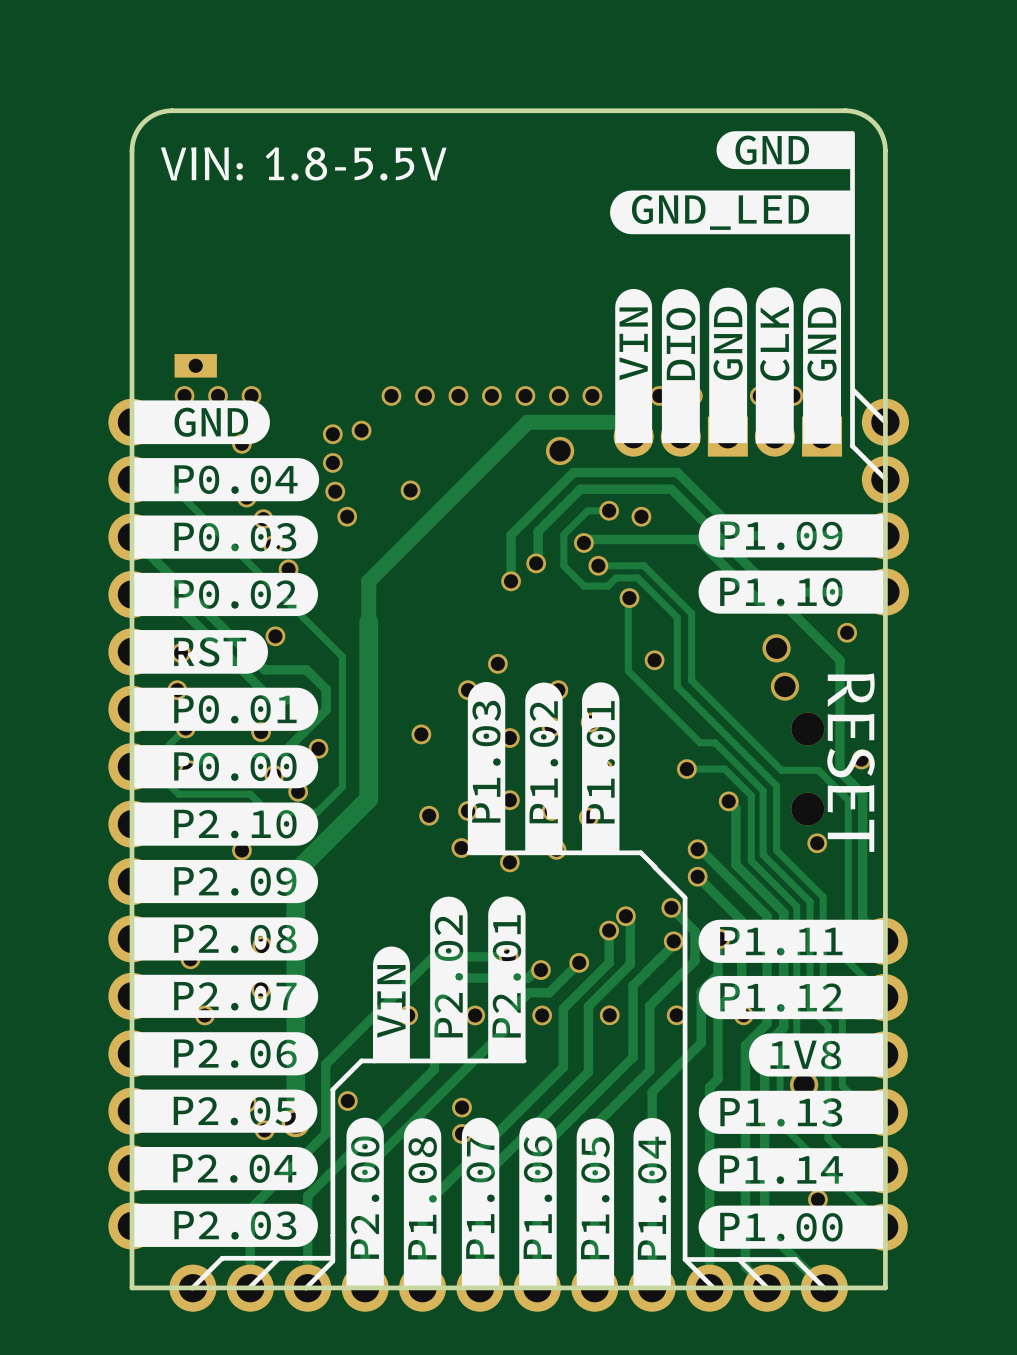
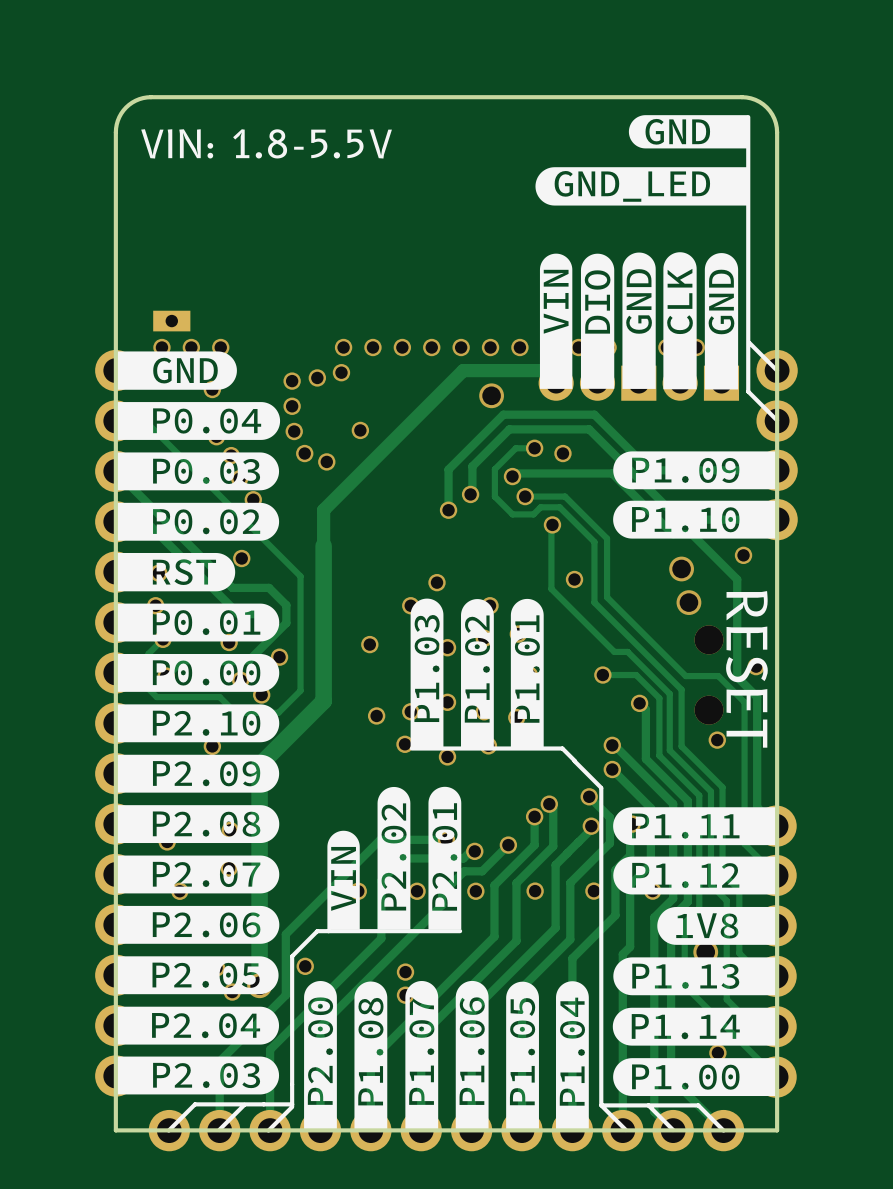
via: none -> (341, 372)
via: none -> (326, 461)

